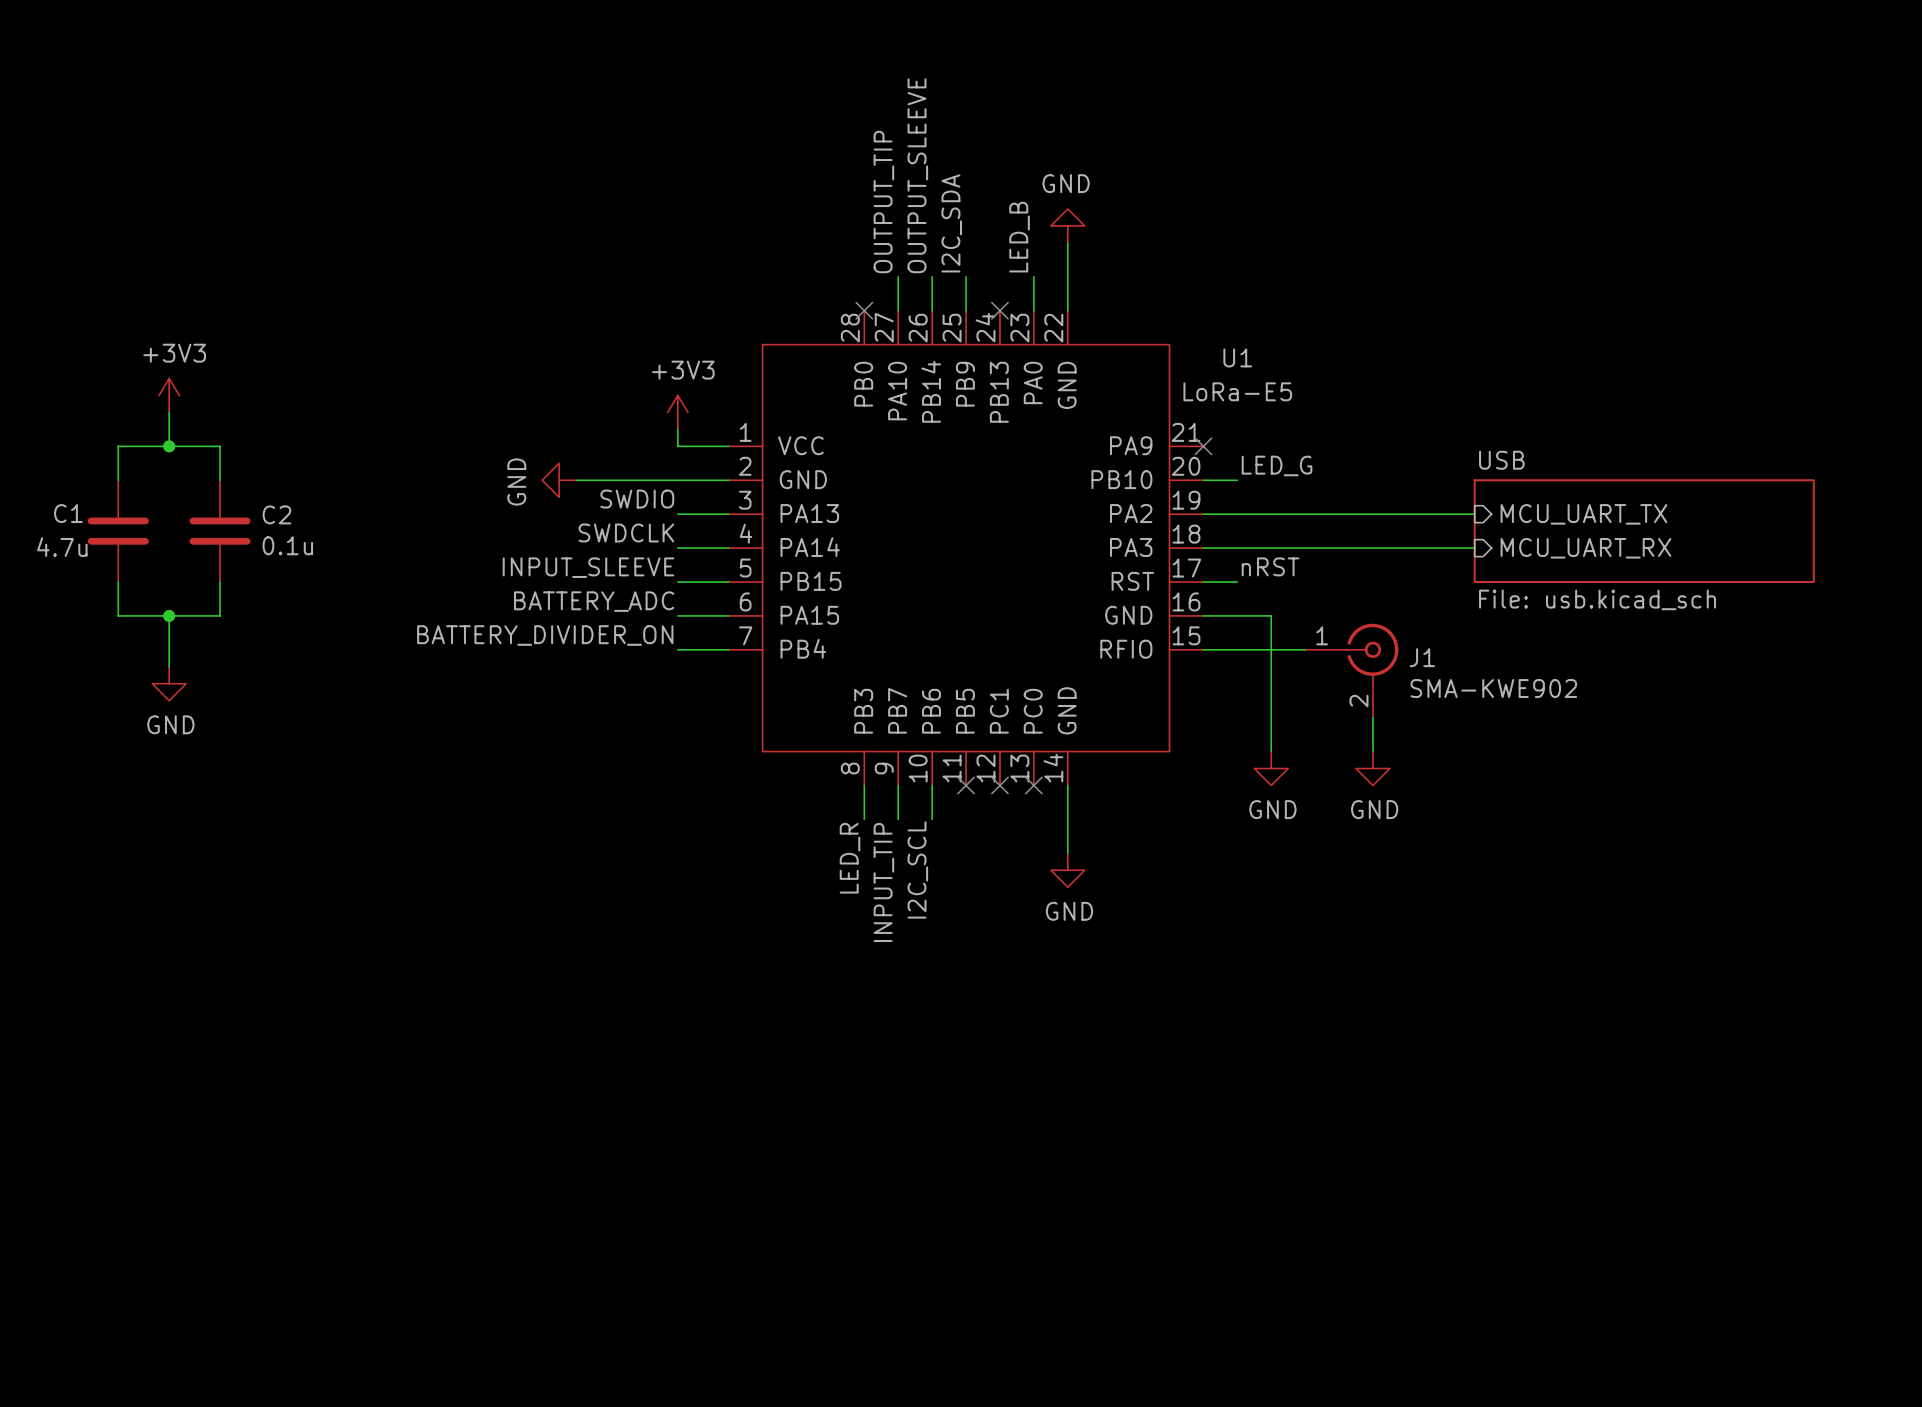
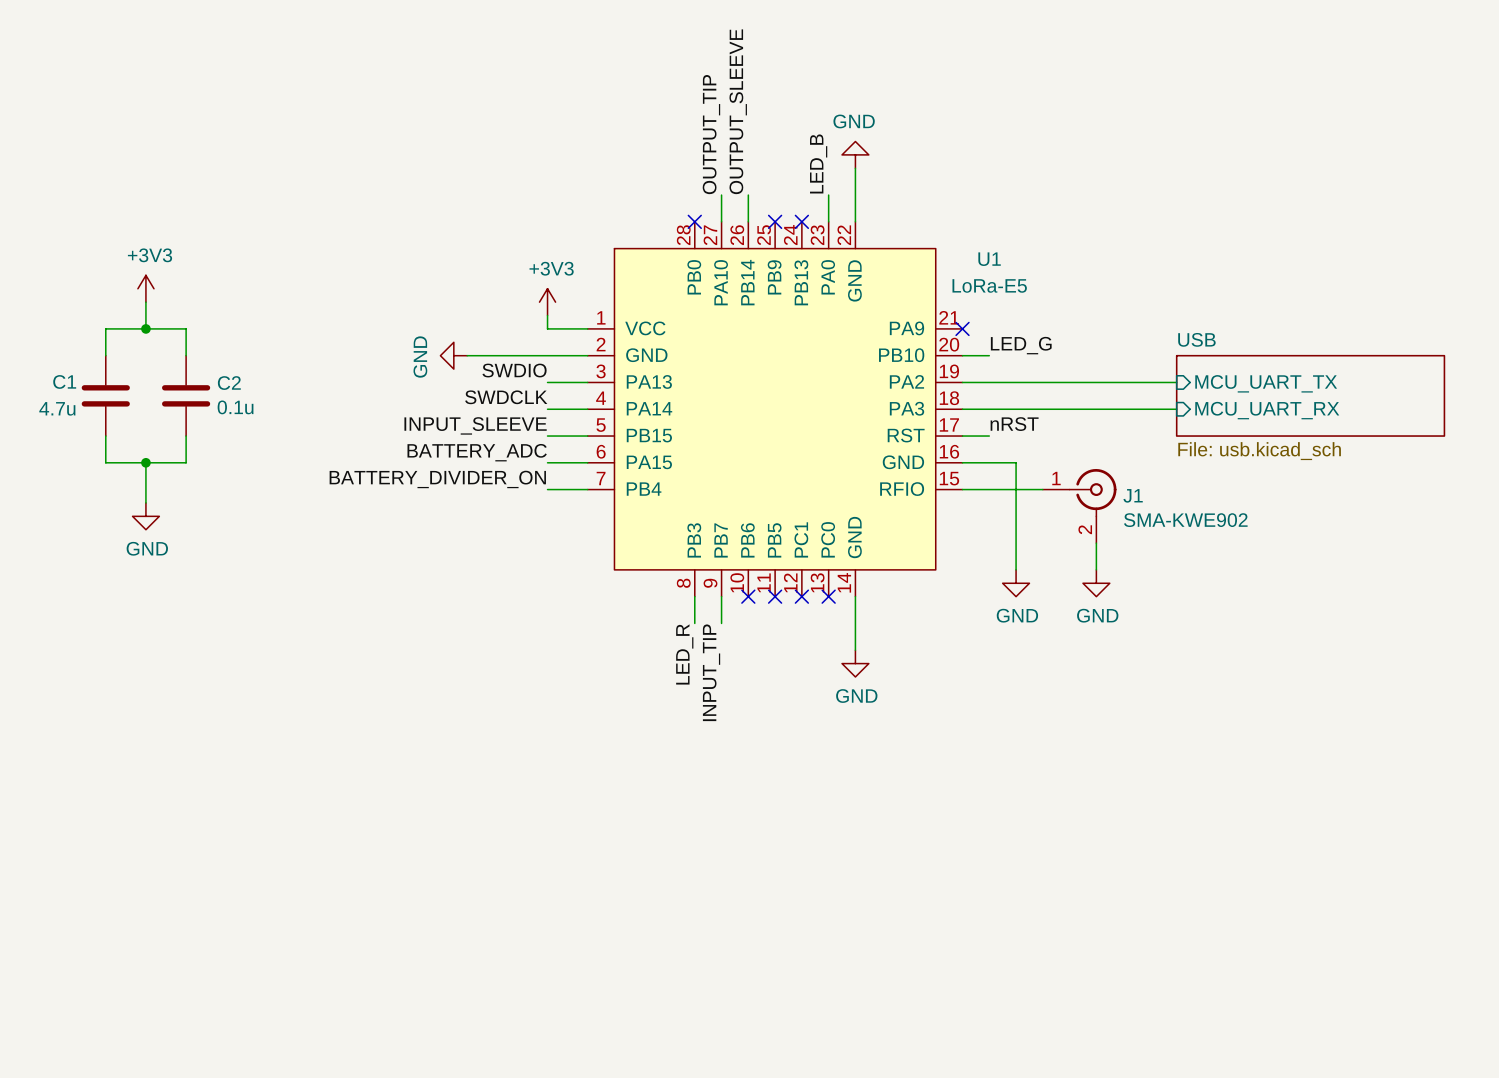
label: I2C_SDA (951, 223) -> none
wire: (966, 276) (966, 310) -> none
no-connect mark: none -> (775, 221)
wire: (932, 785) (932, 819) -> none
no-connect mark: none -> (748, 596)
label: I2C_SCL (917, 869) -> none

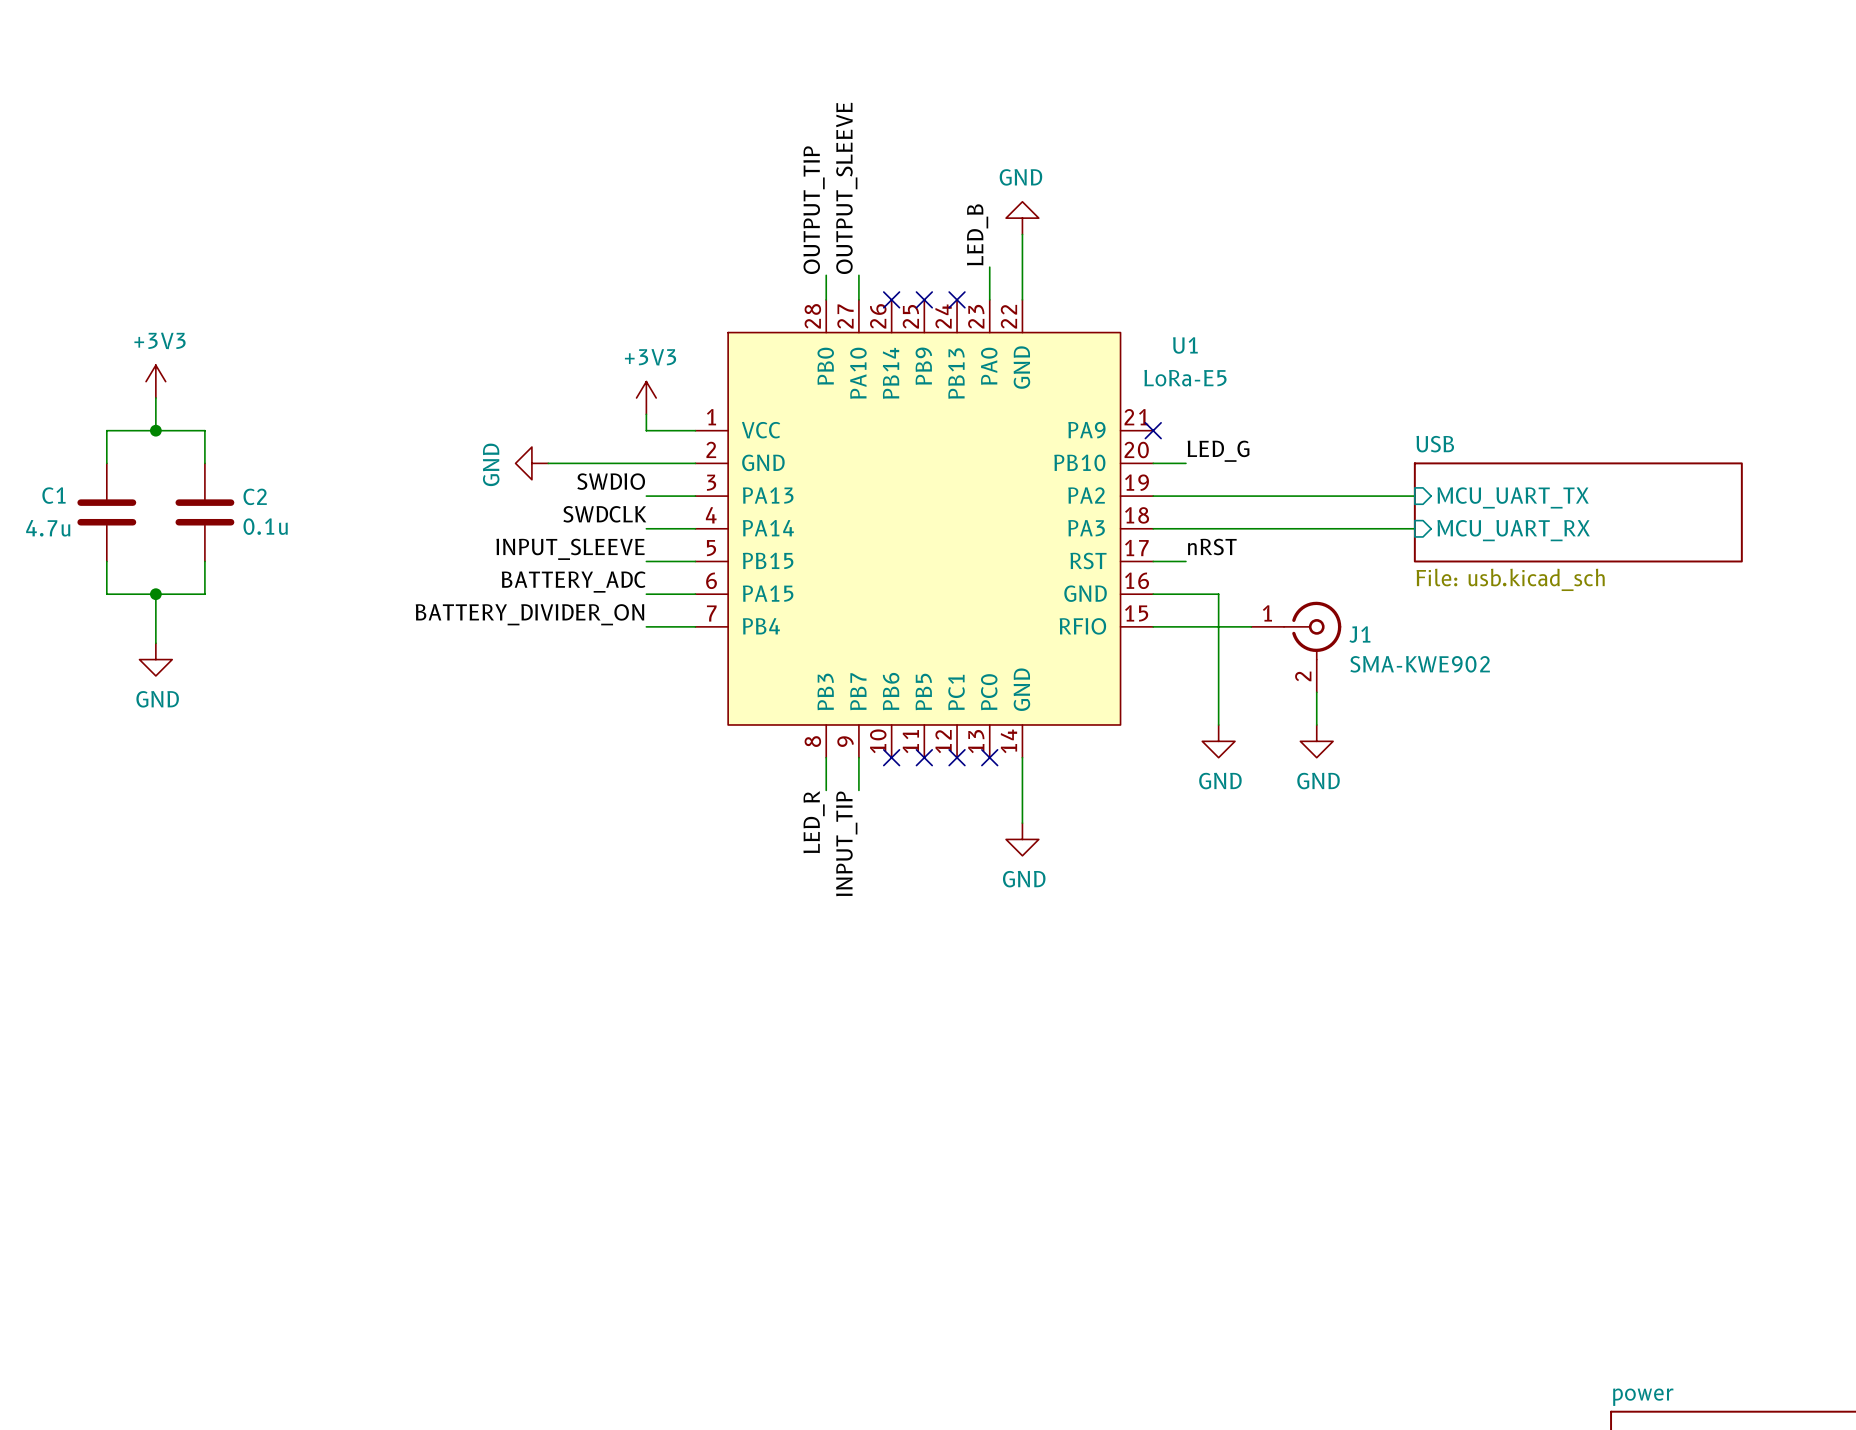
label: OUTPUT_SLEEVE (738, 111) -> none
label: OUTPUT_TIP (711, 134) -> OUTPUT_SLEEVE (846, 188)
label: none -> OUTPUT_TIP (814, 210)
wire: (721, 195) (721, 201) -> none
wire: (748, 195) (748, 221) -> none
wire: none -> (826, 275) (826, 299)
no-connect mark position: (694, 221) -> (891, 299)

